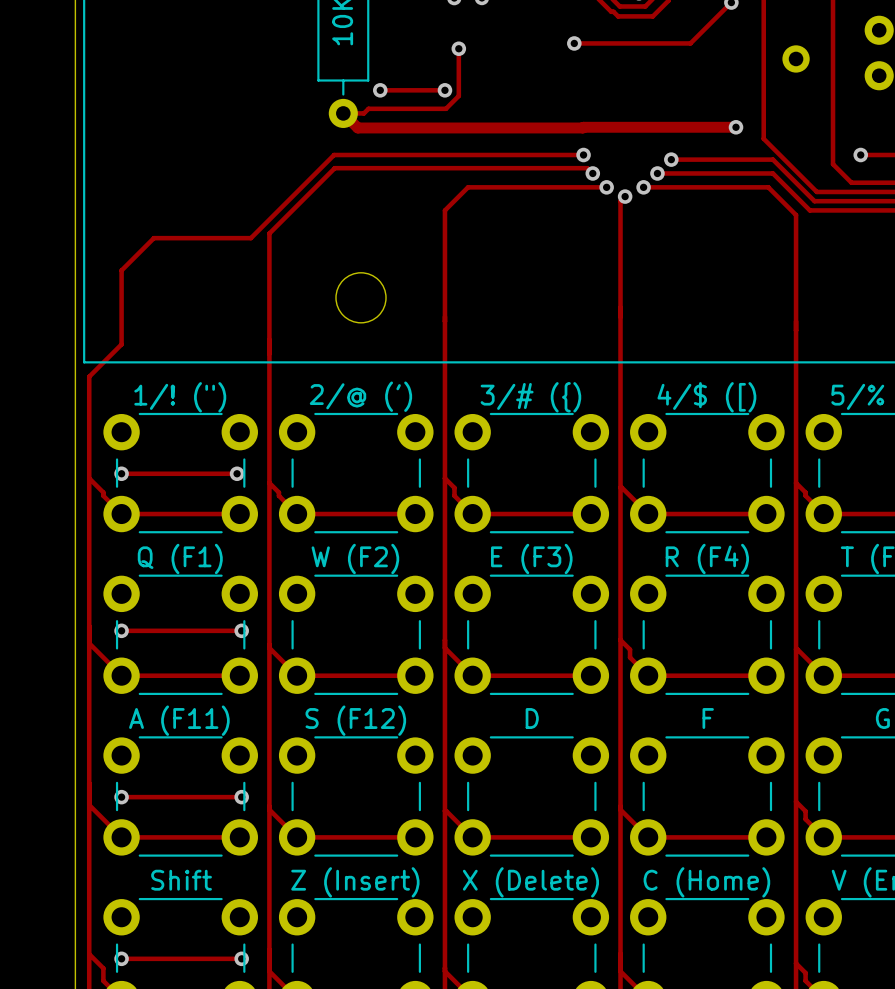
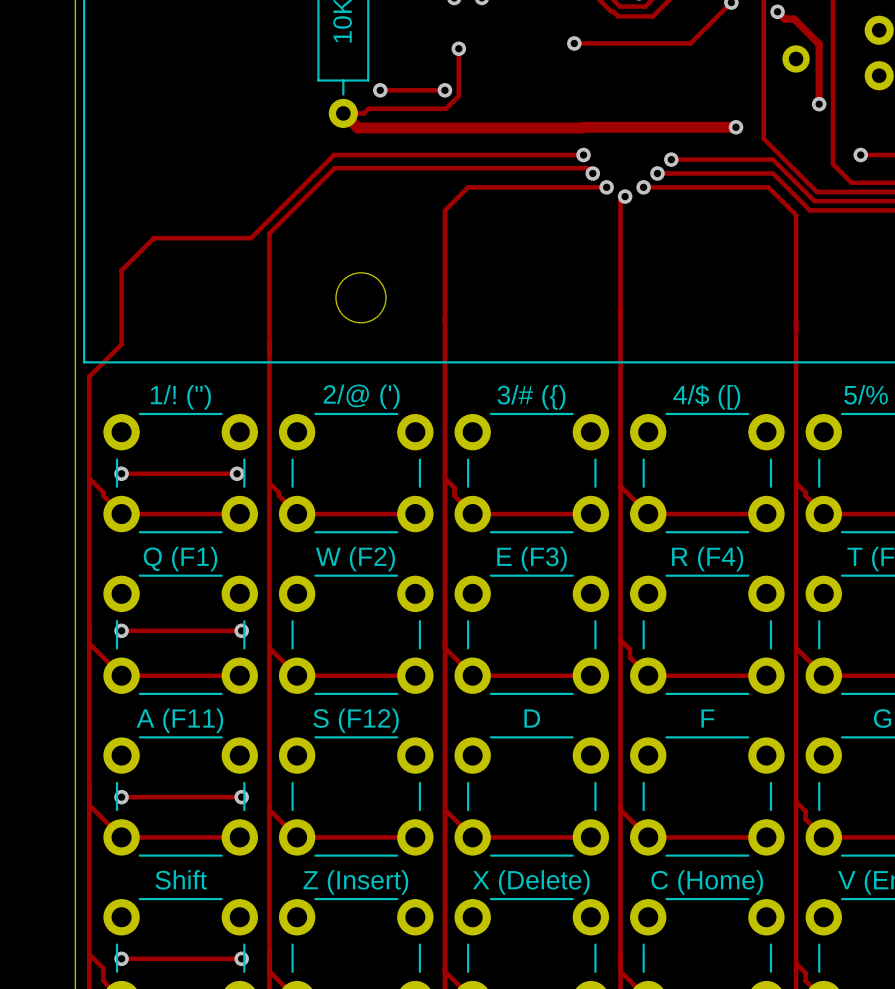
track: none -> (777, 11) (784, 19) (794, 19) (819, 44) (819, 104)
via: none -> (777, 11)
via: none -> (819, 104)

